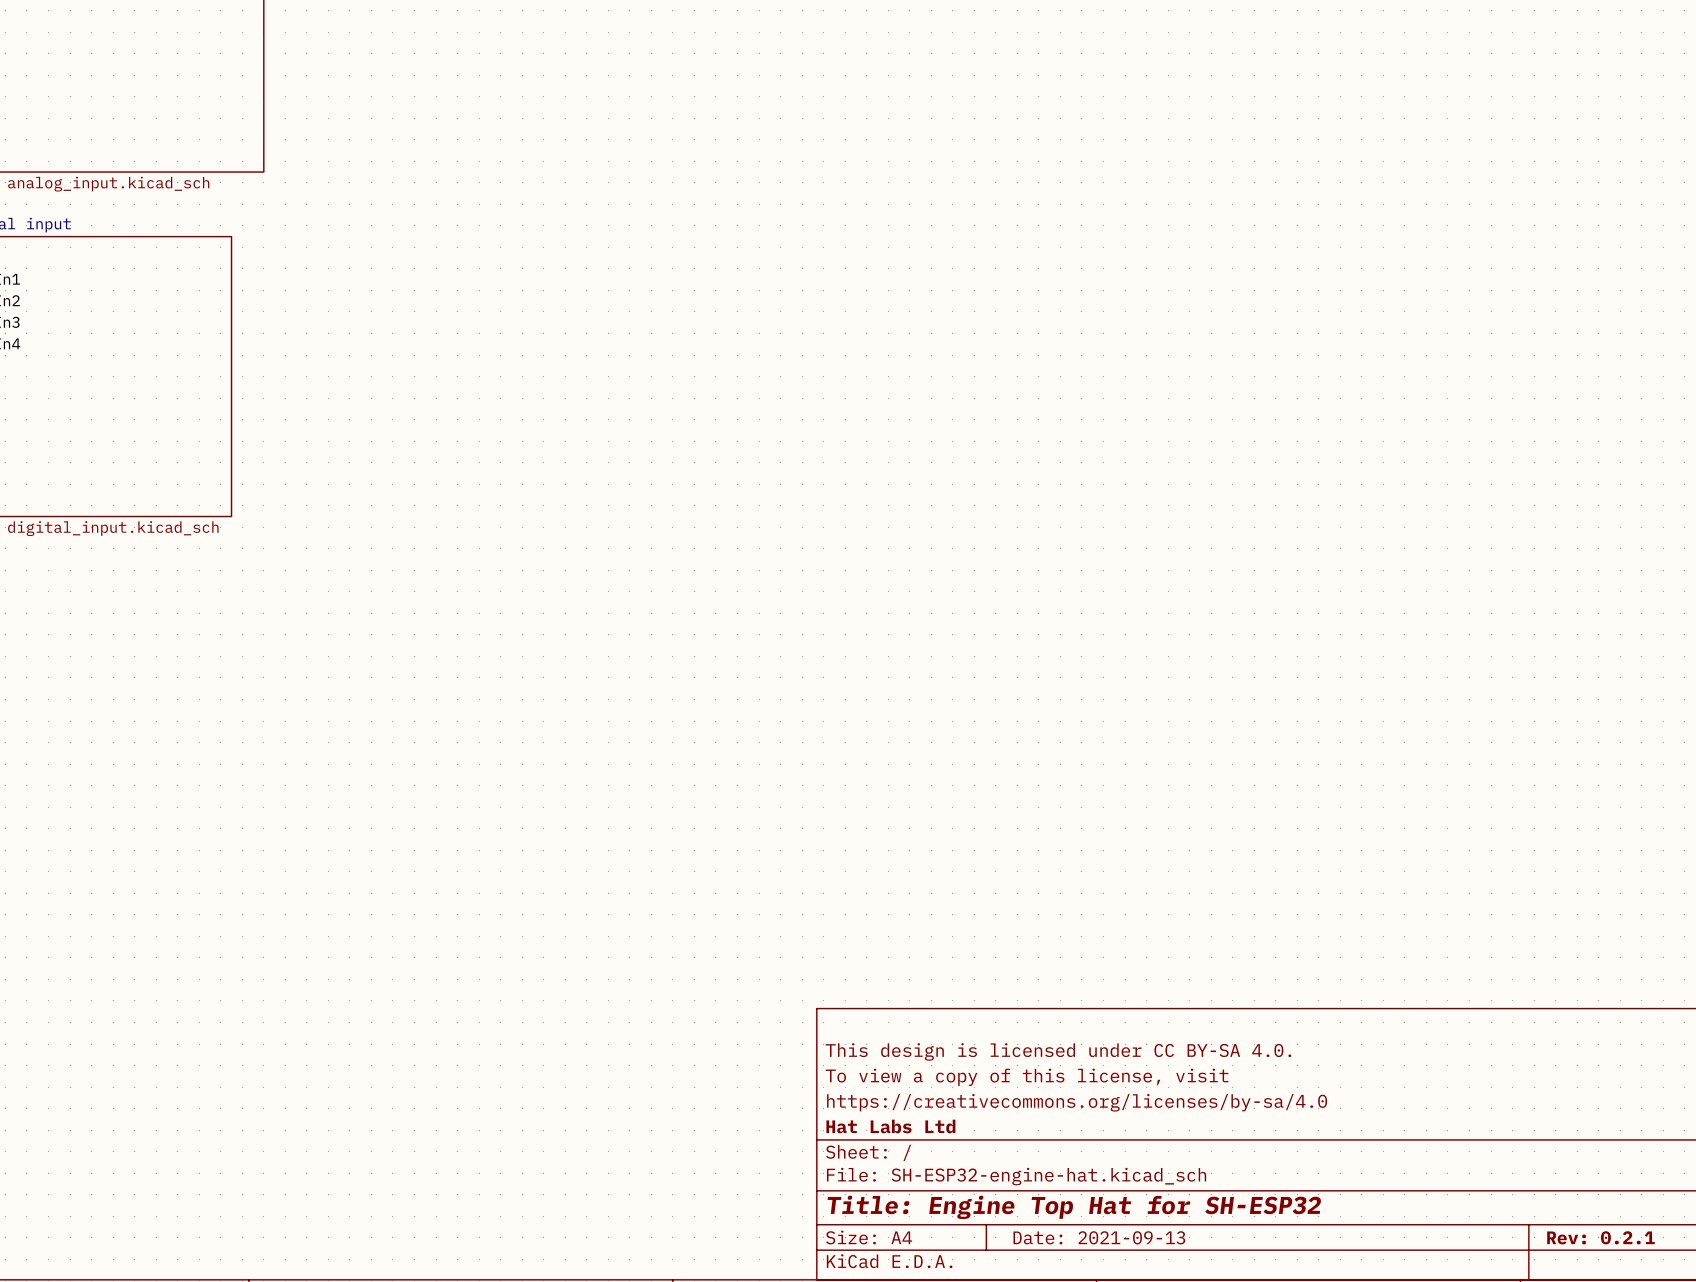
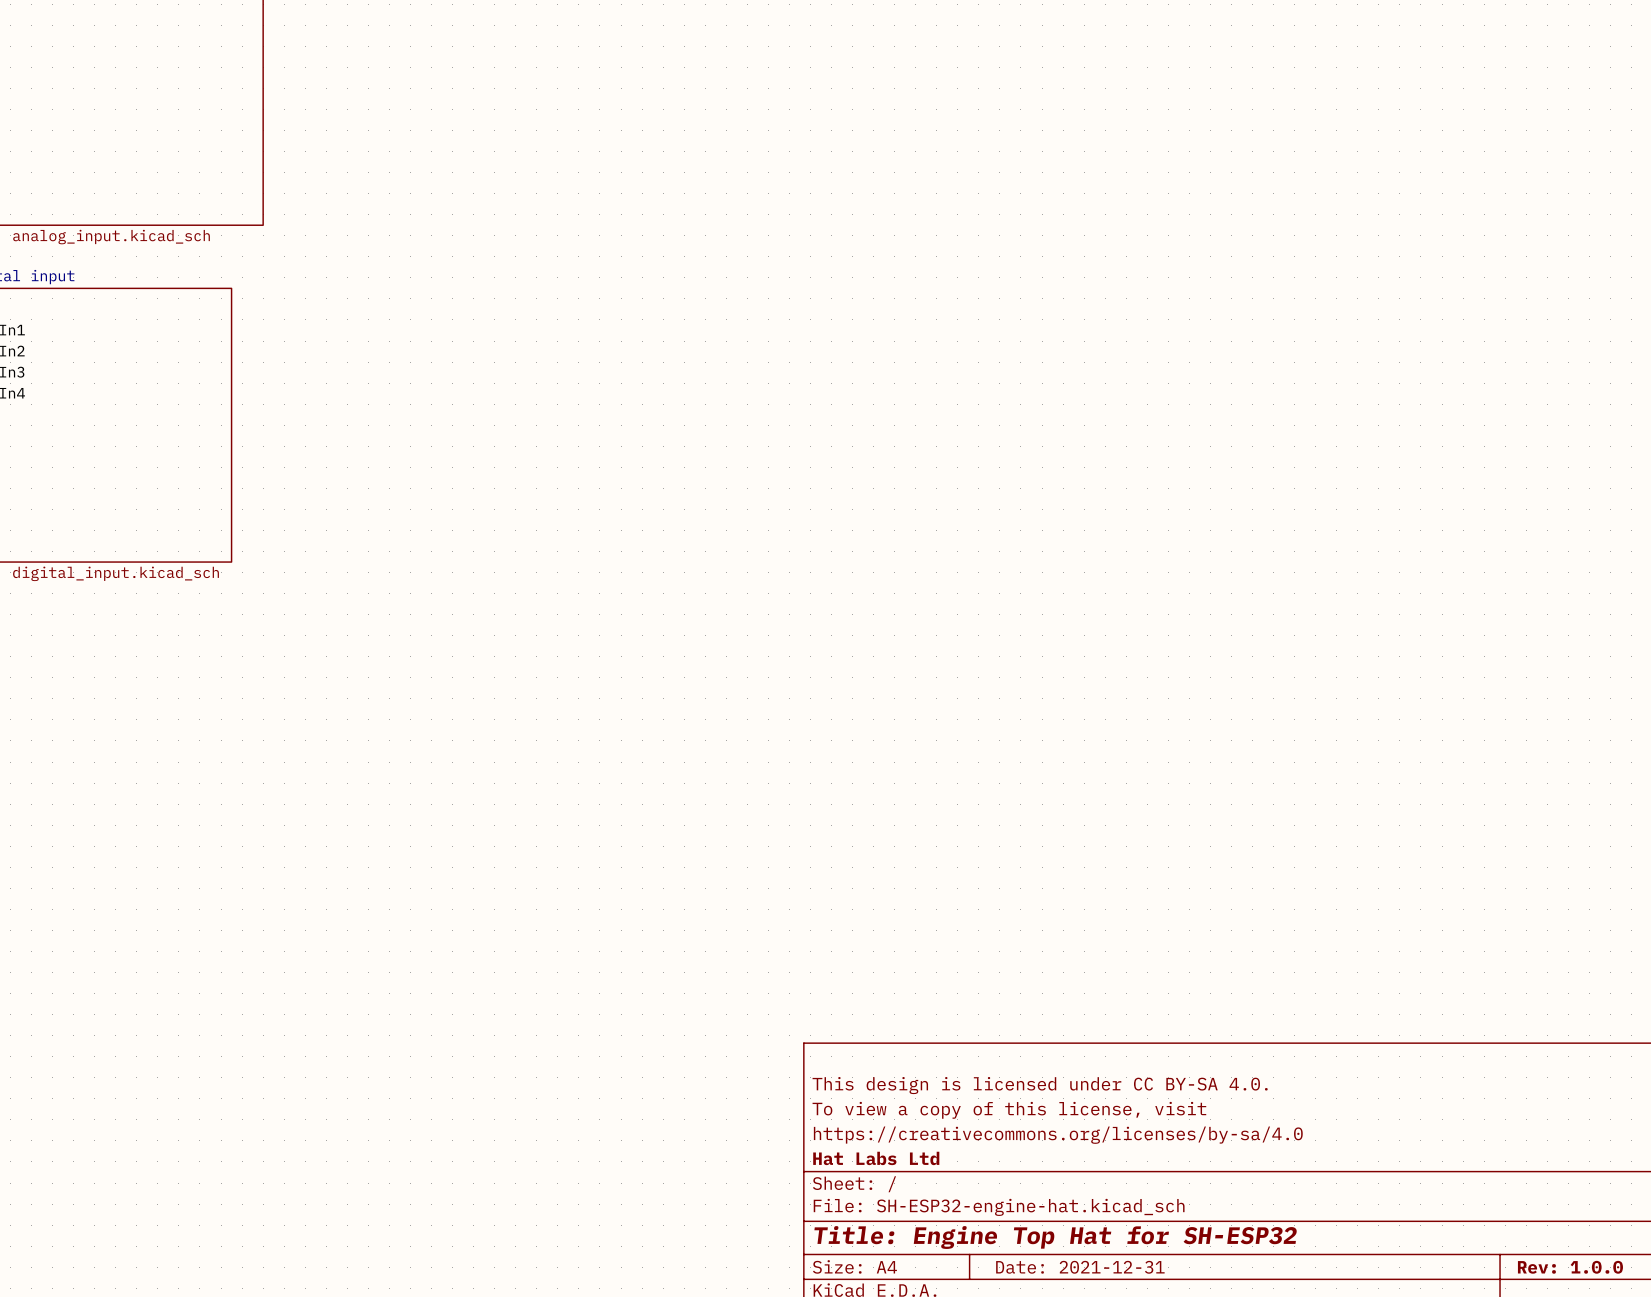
title block: Date: 2021-09-13 (1099, 1237) -> Date: 2021-12-31 (1080, 1267)
title block: Rev: 0.2.1 (1600, 1237) -> Rev: 1.0.0 (1570, 1267)

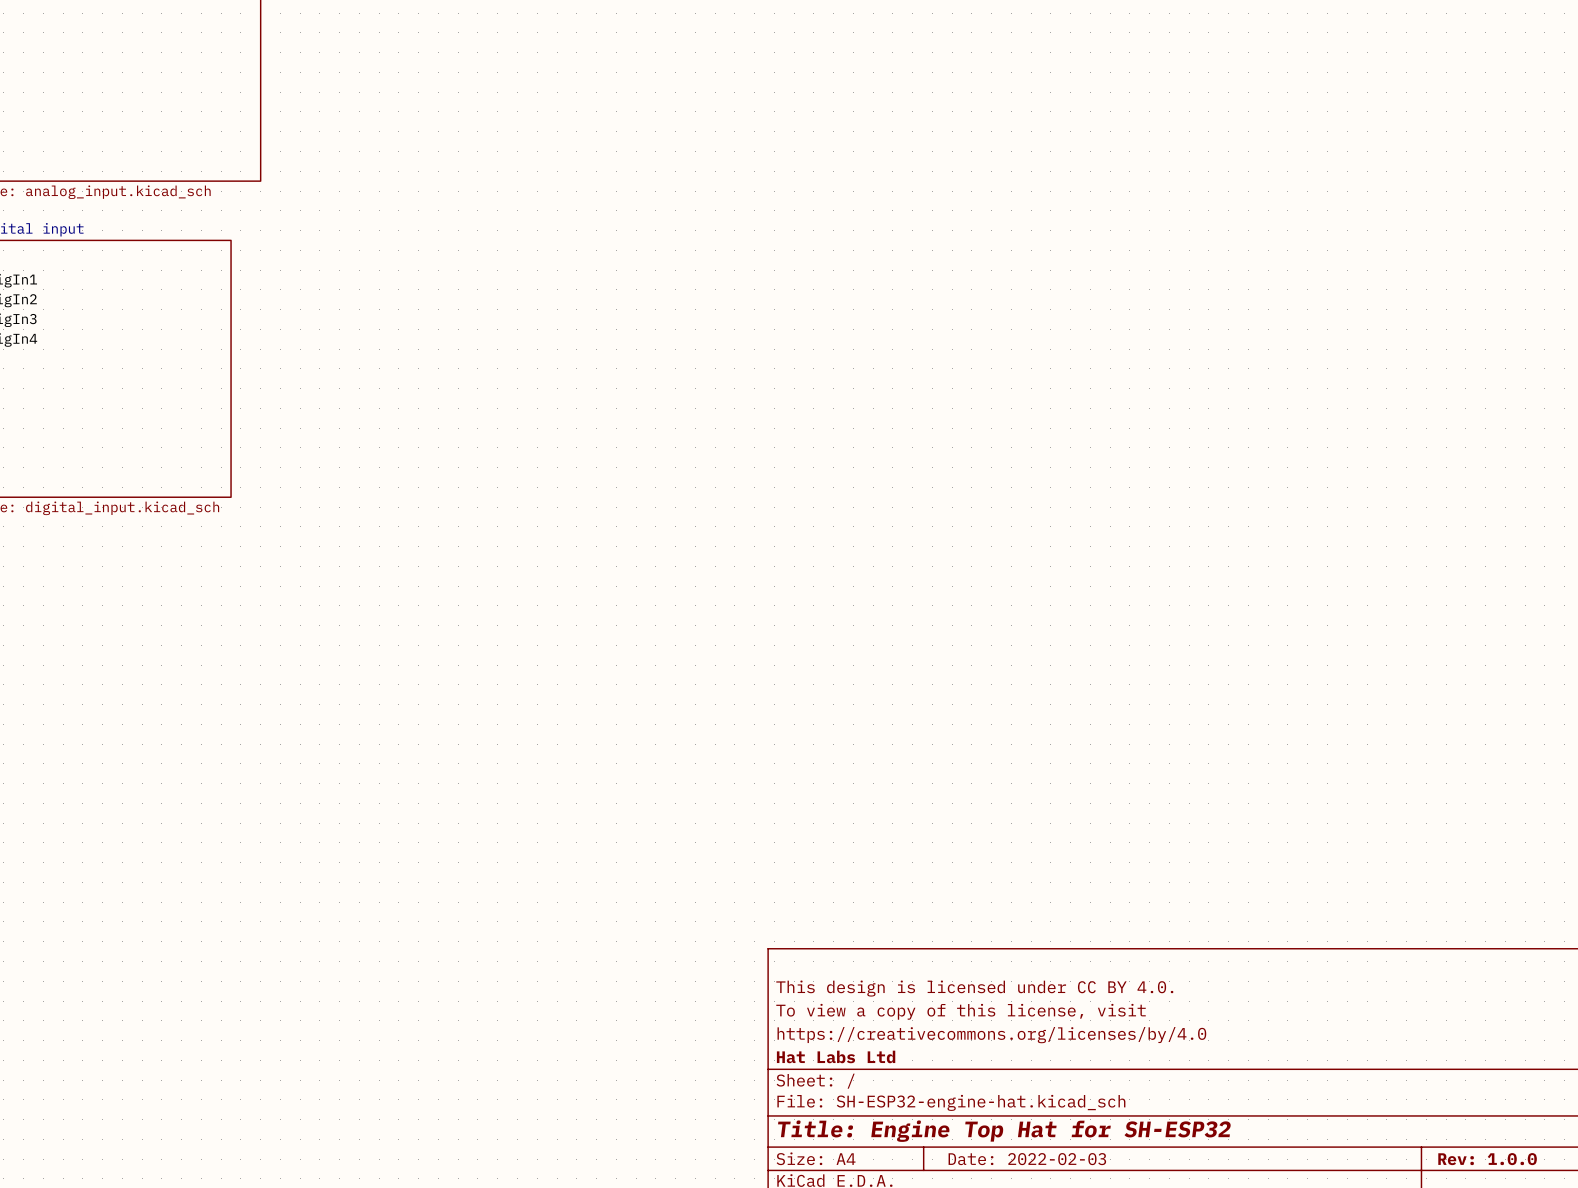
title block: This design is licensed under CC BY-SA 4.0. (1040, 1085) -> This design is licensed under CC BY 4.0. (974, 988)
title block: https://creativecommons.org/licenses/by-sa/4.0 (1058, 1135) -> https://creativecommons.org/licenses/by/4.0 (991, 1035)
title block: Date: 2021-12-31 (1080, 1267) -> Date: 2022-02-03 (1027, 1159)

